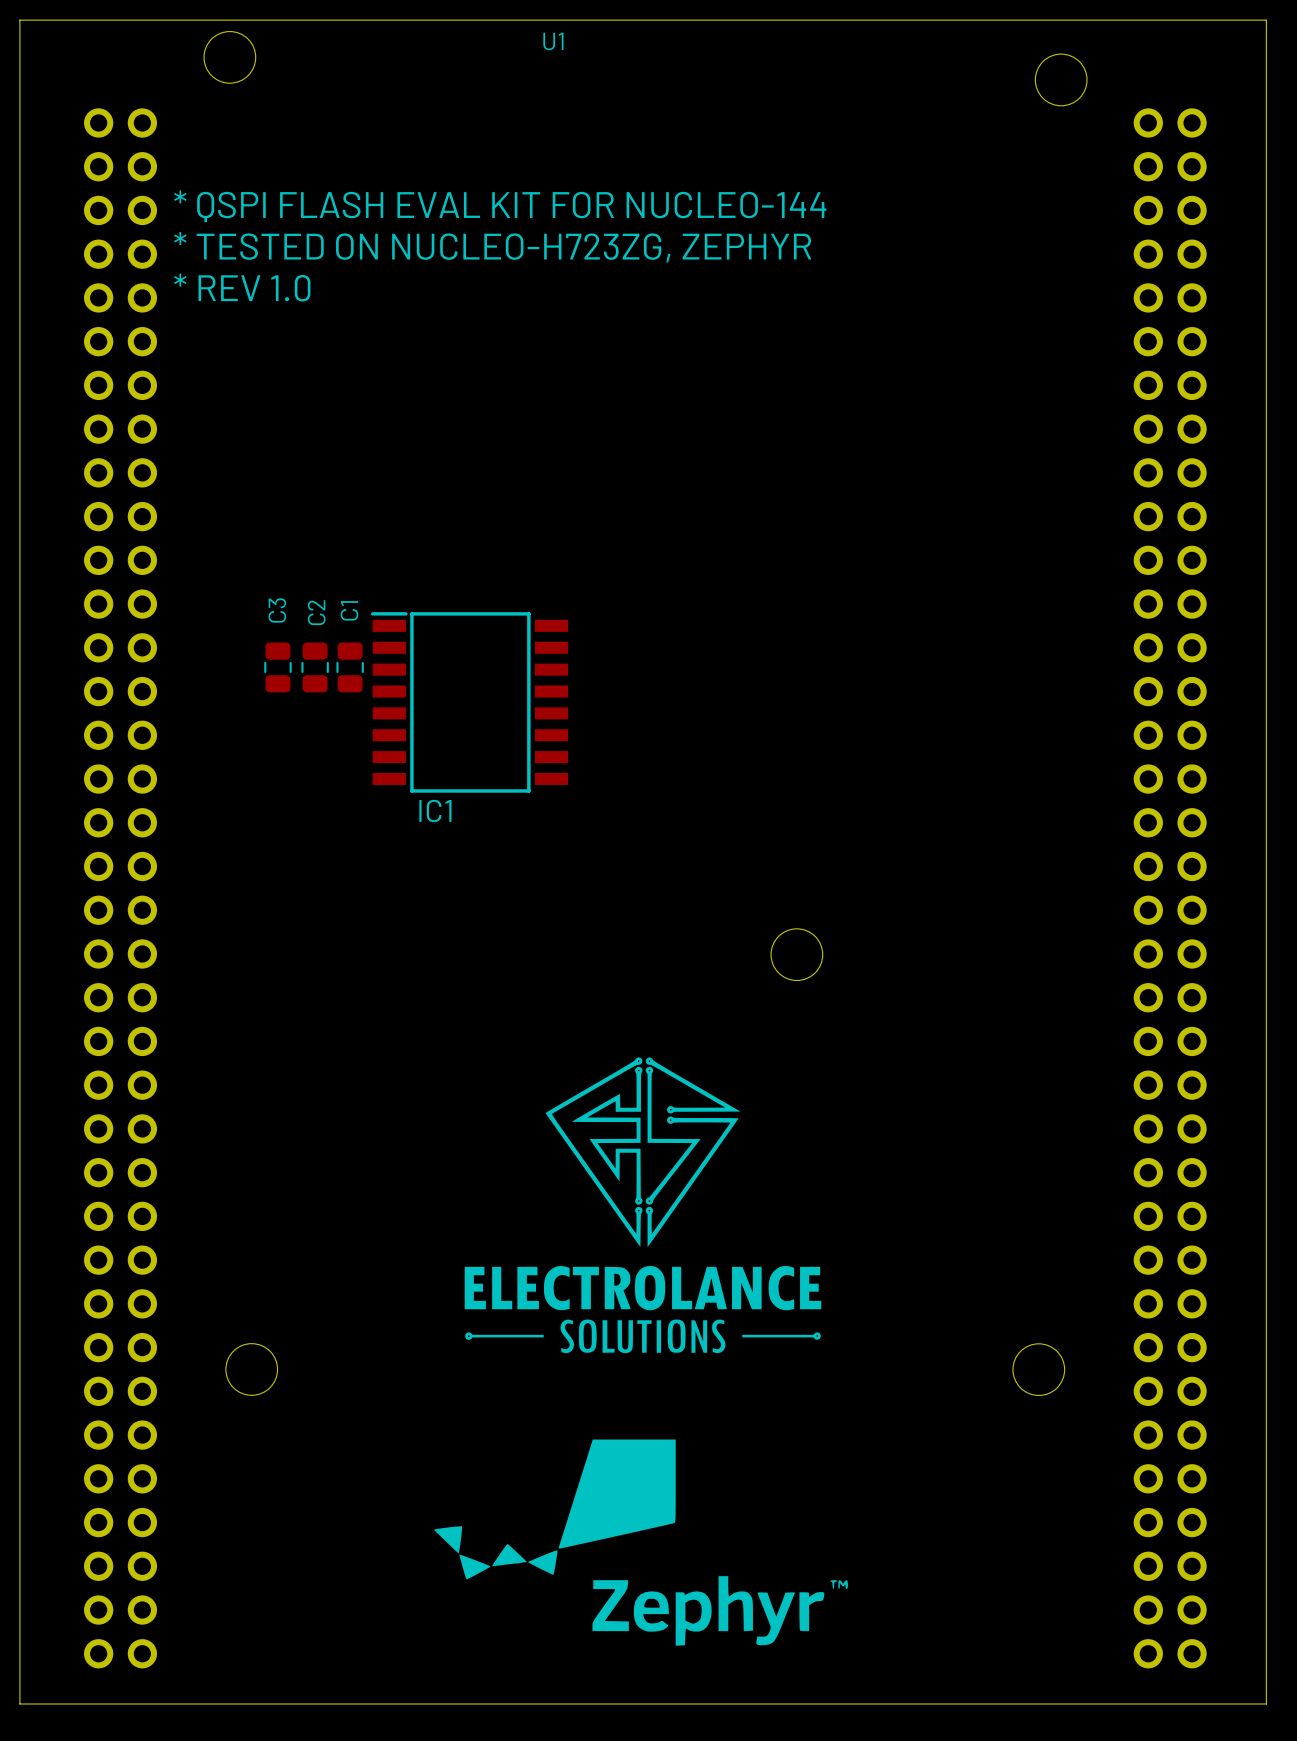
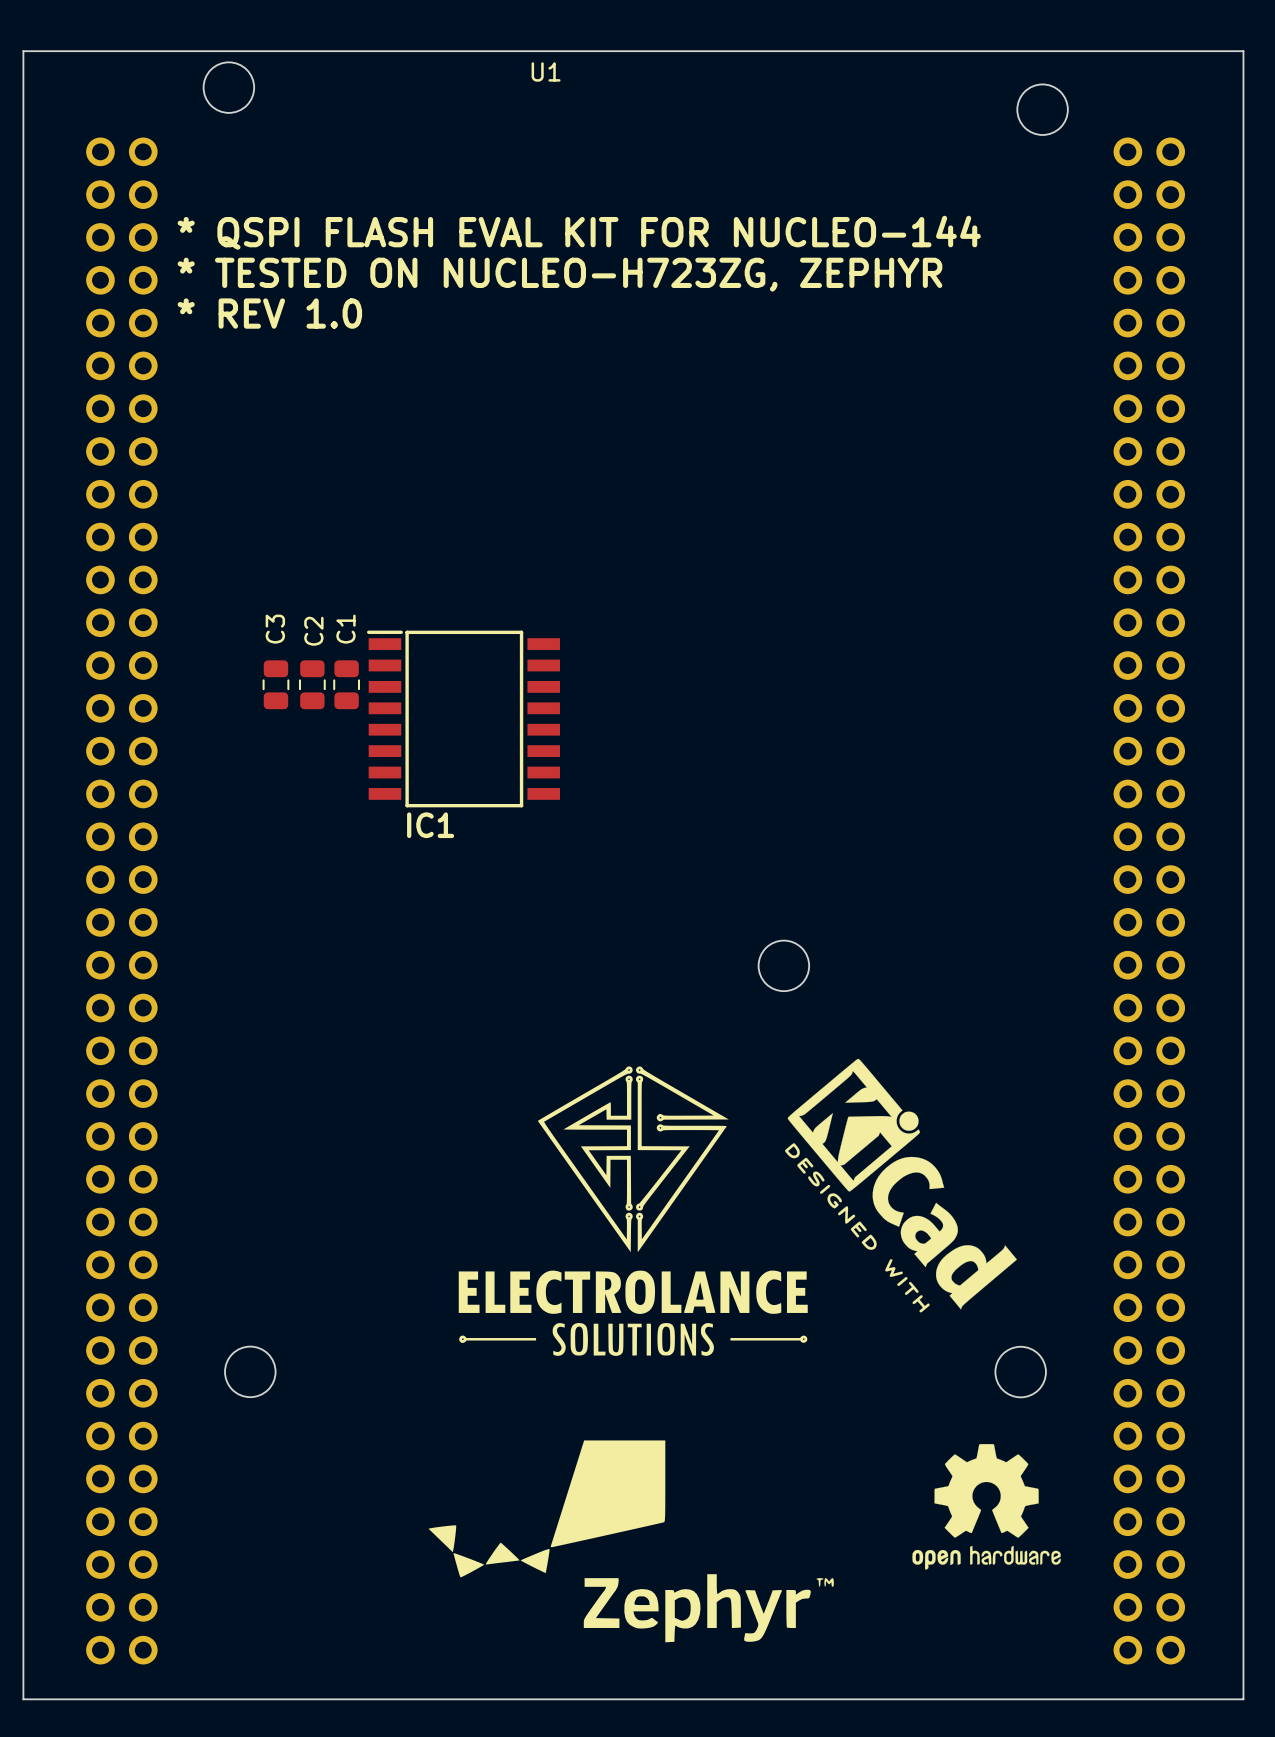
drawing: none -> [785, 1058, 1017, 1313]
drawing: none -> [912, 1444, 1061, 1570]

